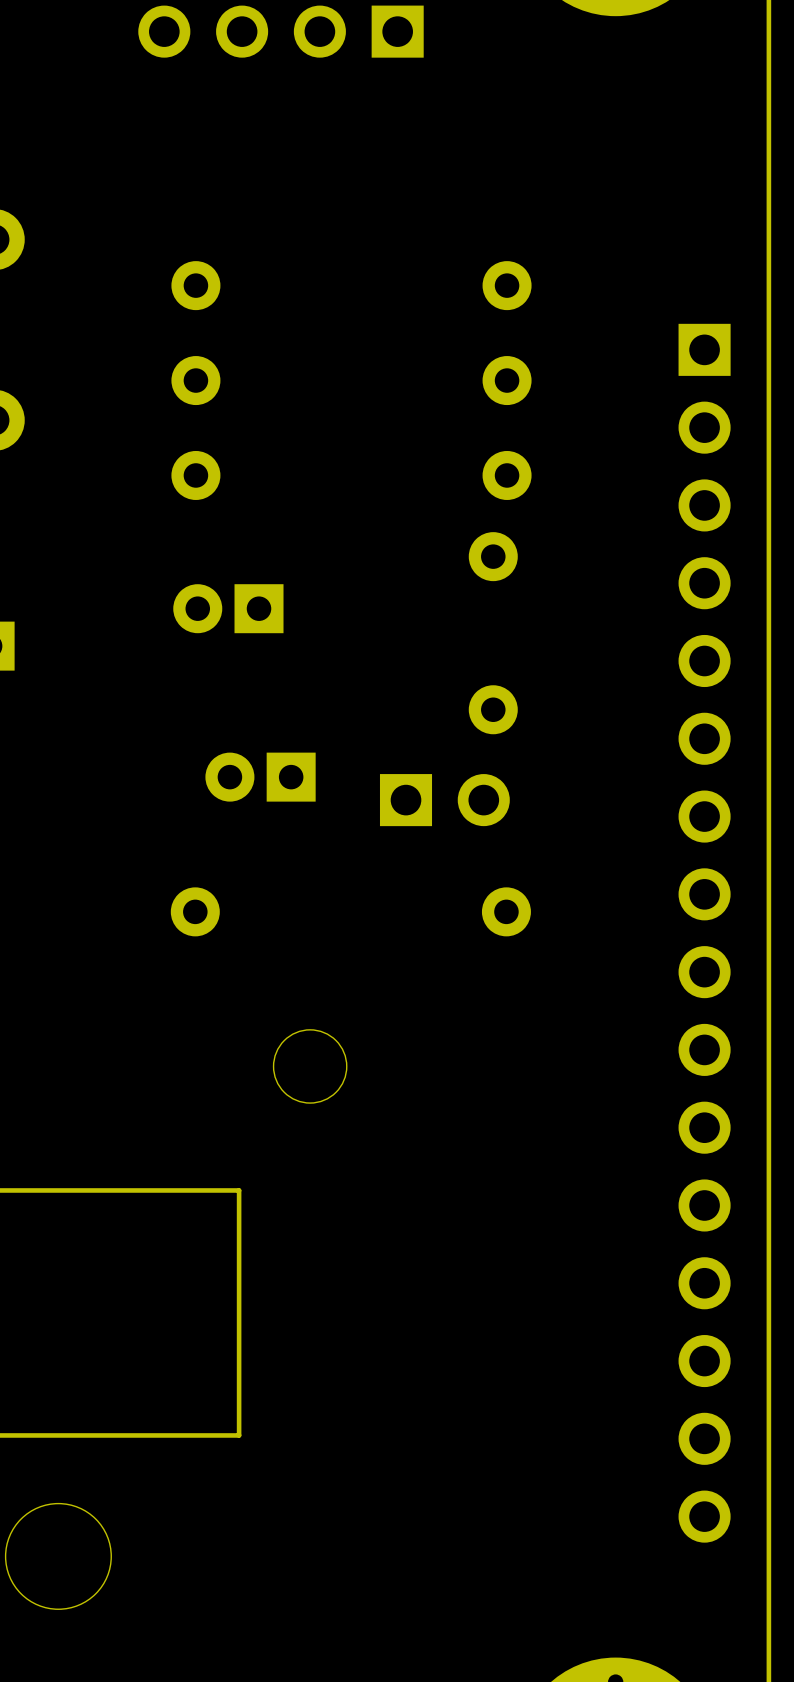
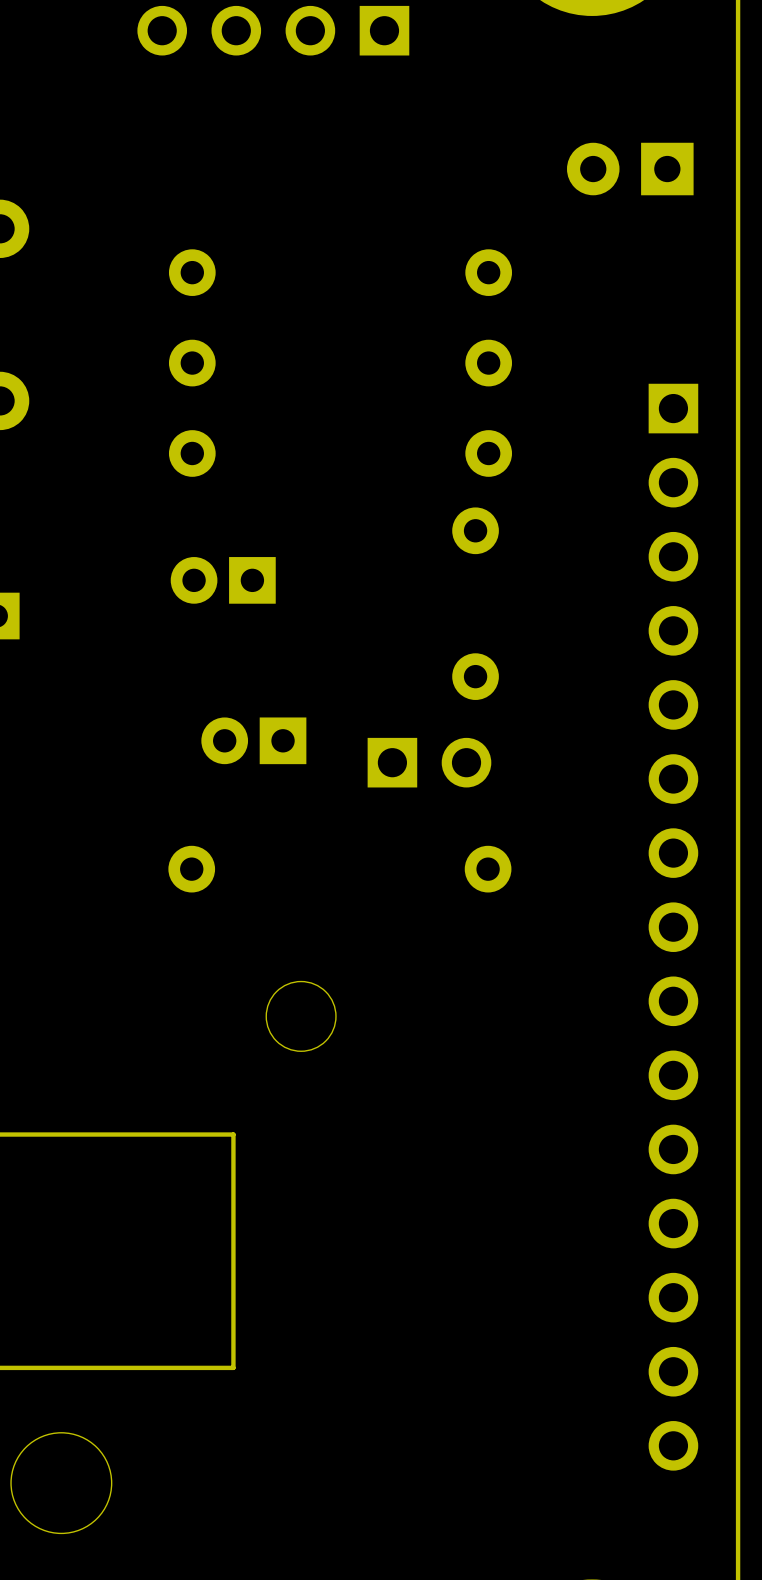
part: none -> (630, 169)
part: (704, 933) -> none
part: none -> (673, 927)

